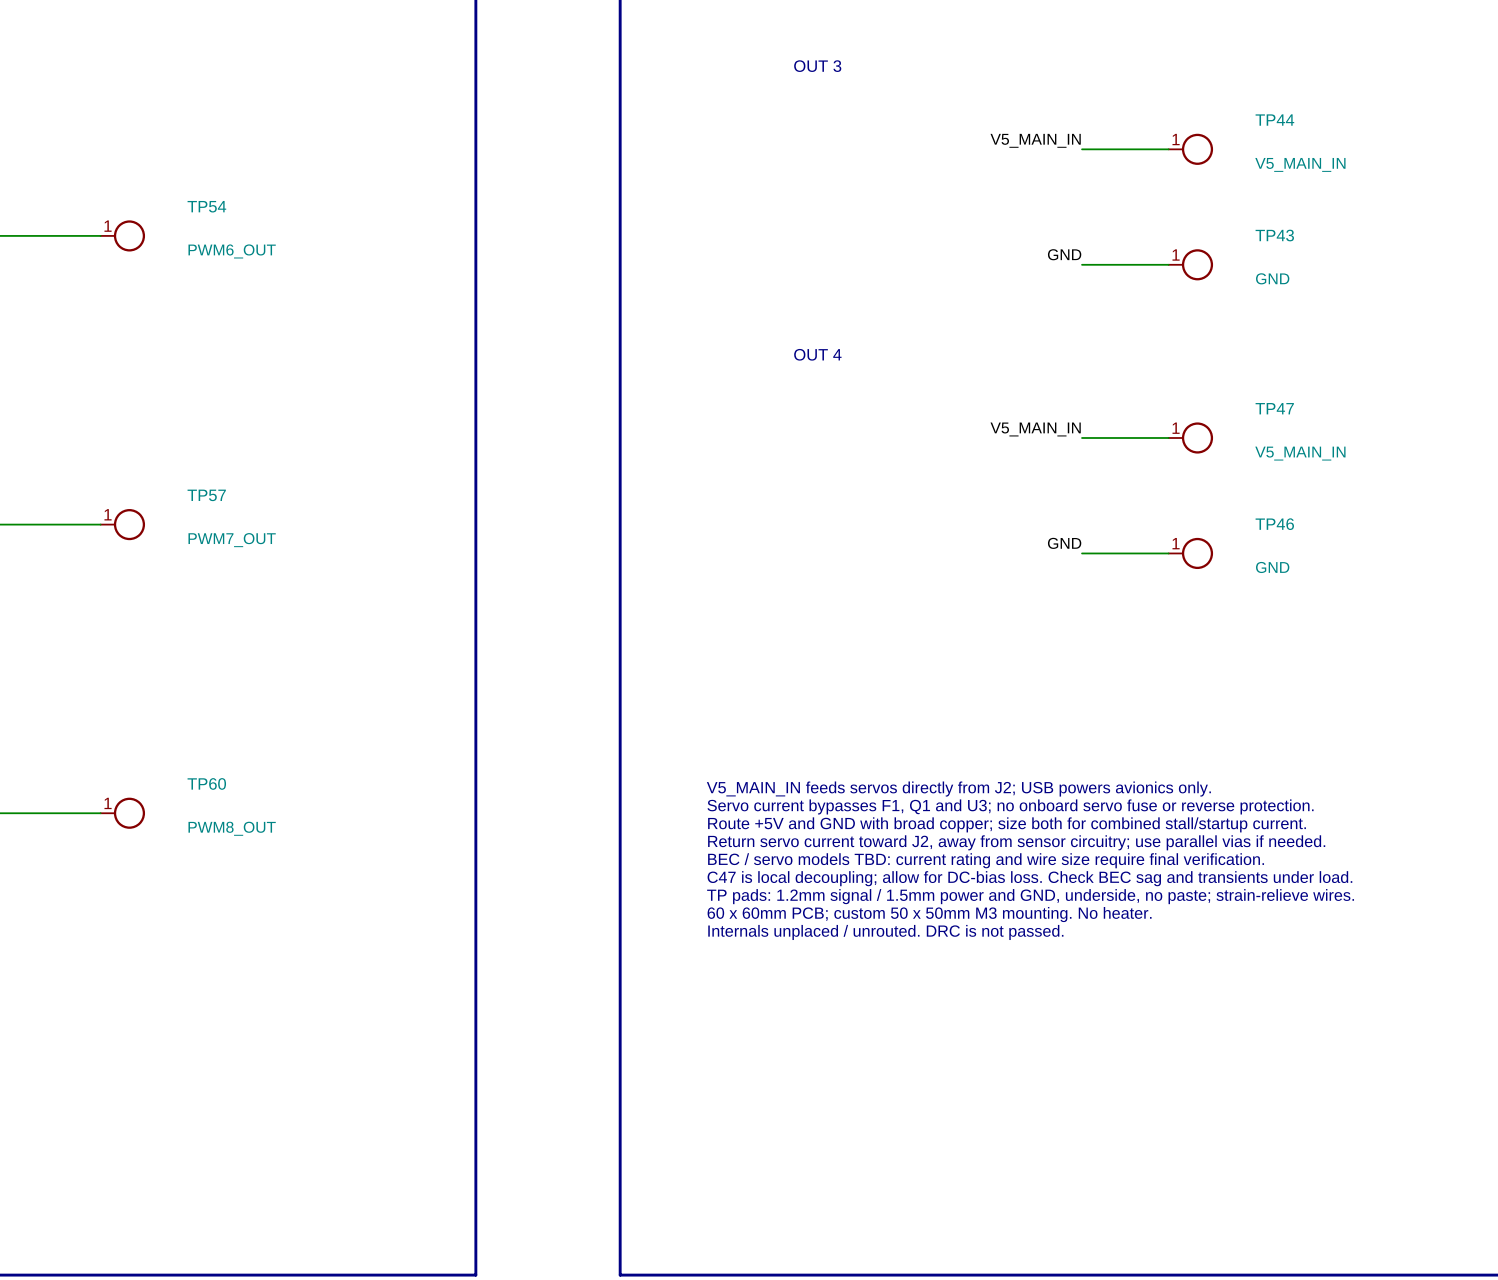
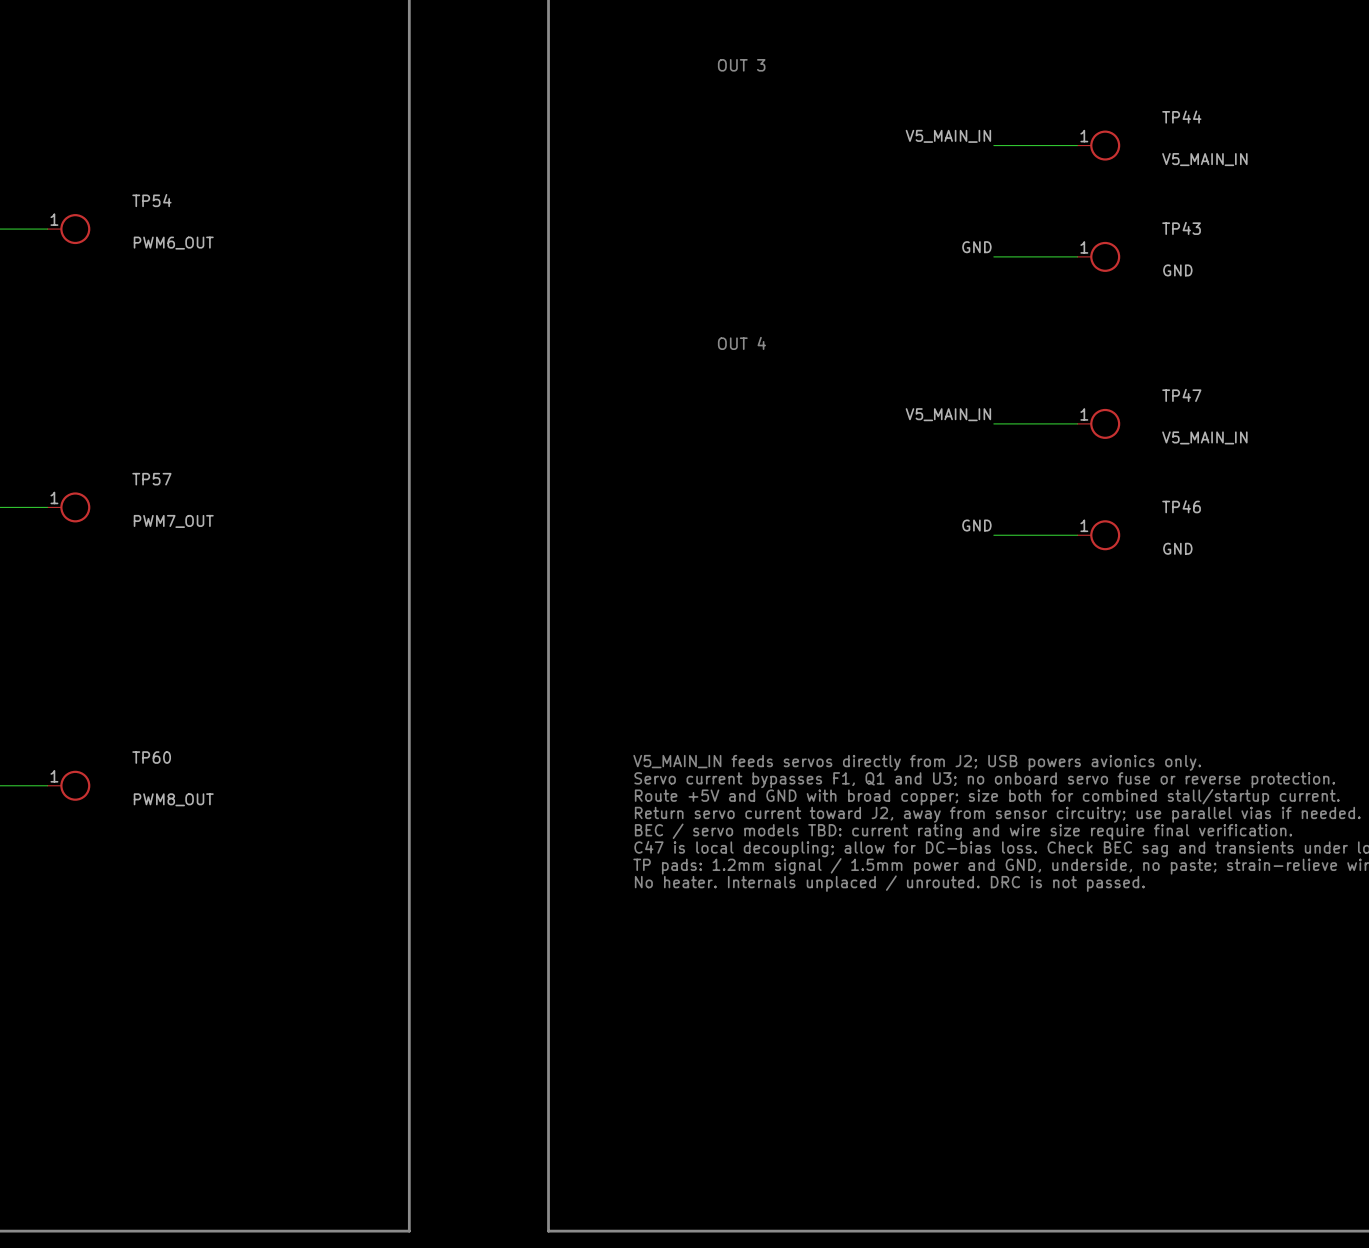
text: 60 x 60mm PCB; custom 50 x 50mm M3 mounting. No heater. (929, 914) -> No heater. Internals unplaced / unrouted. DRC is not passed. (889, 883)
text: Internals unplaced / unrouted. DRC is not passed. (885, 932) -> none

